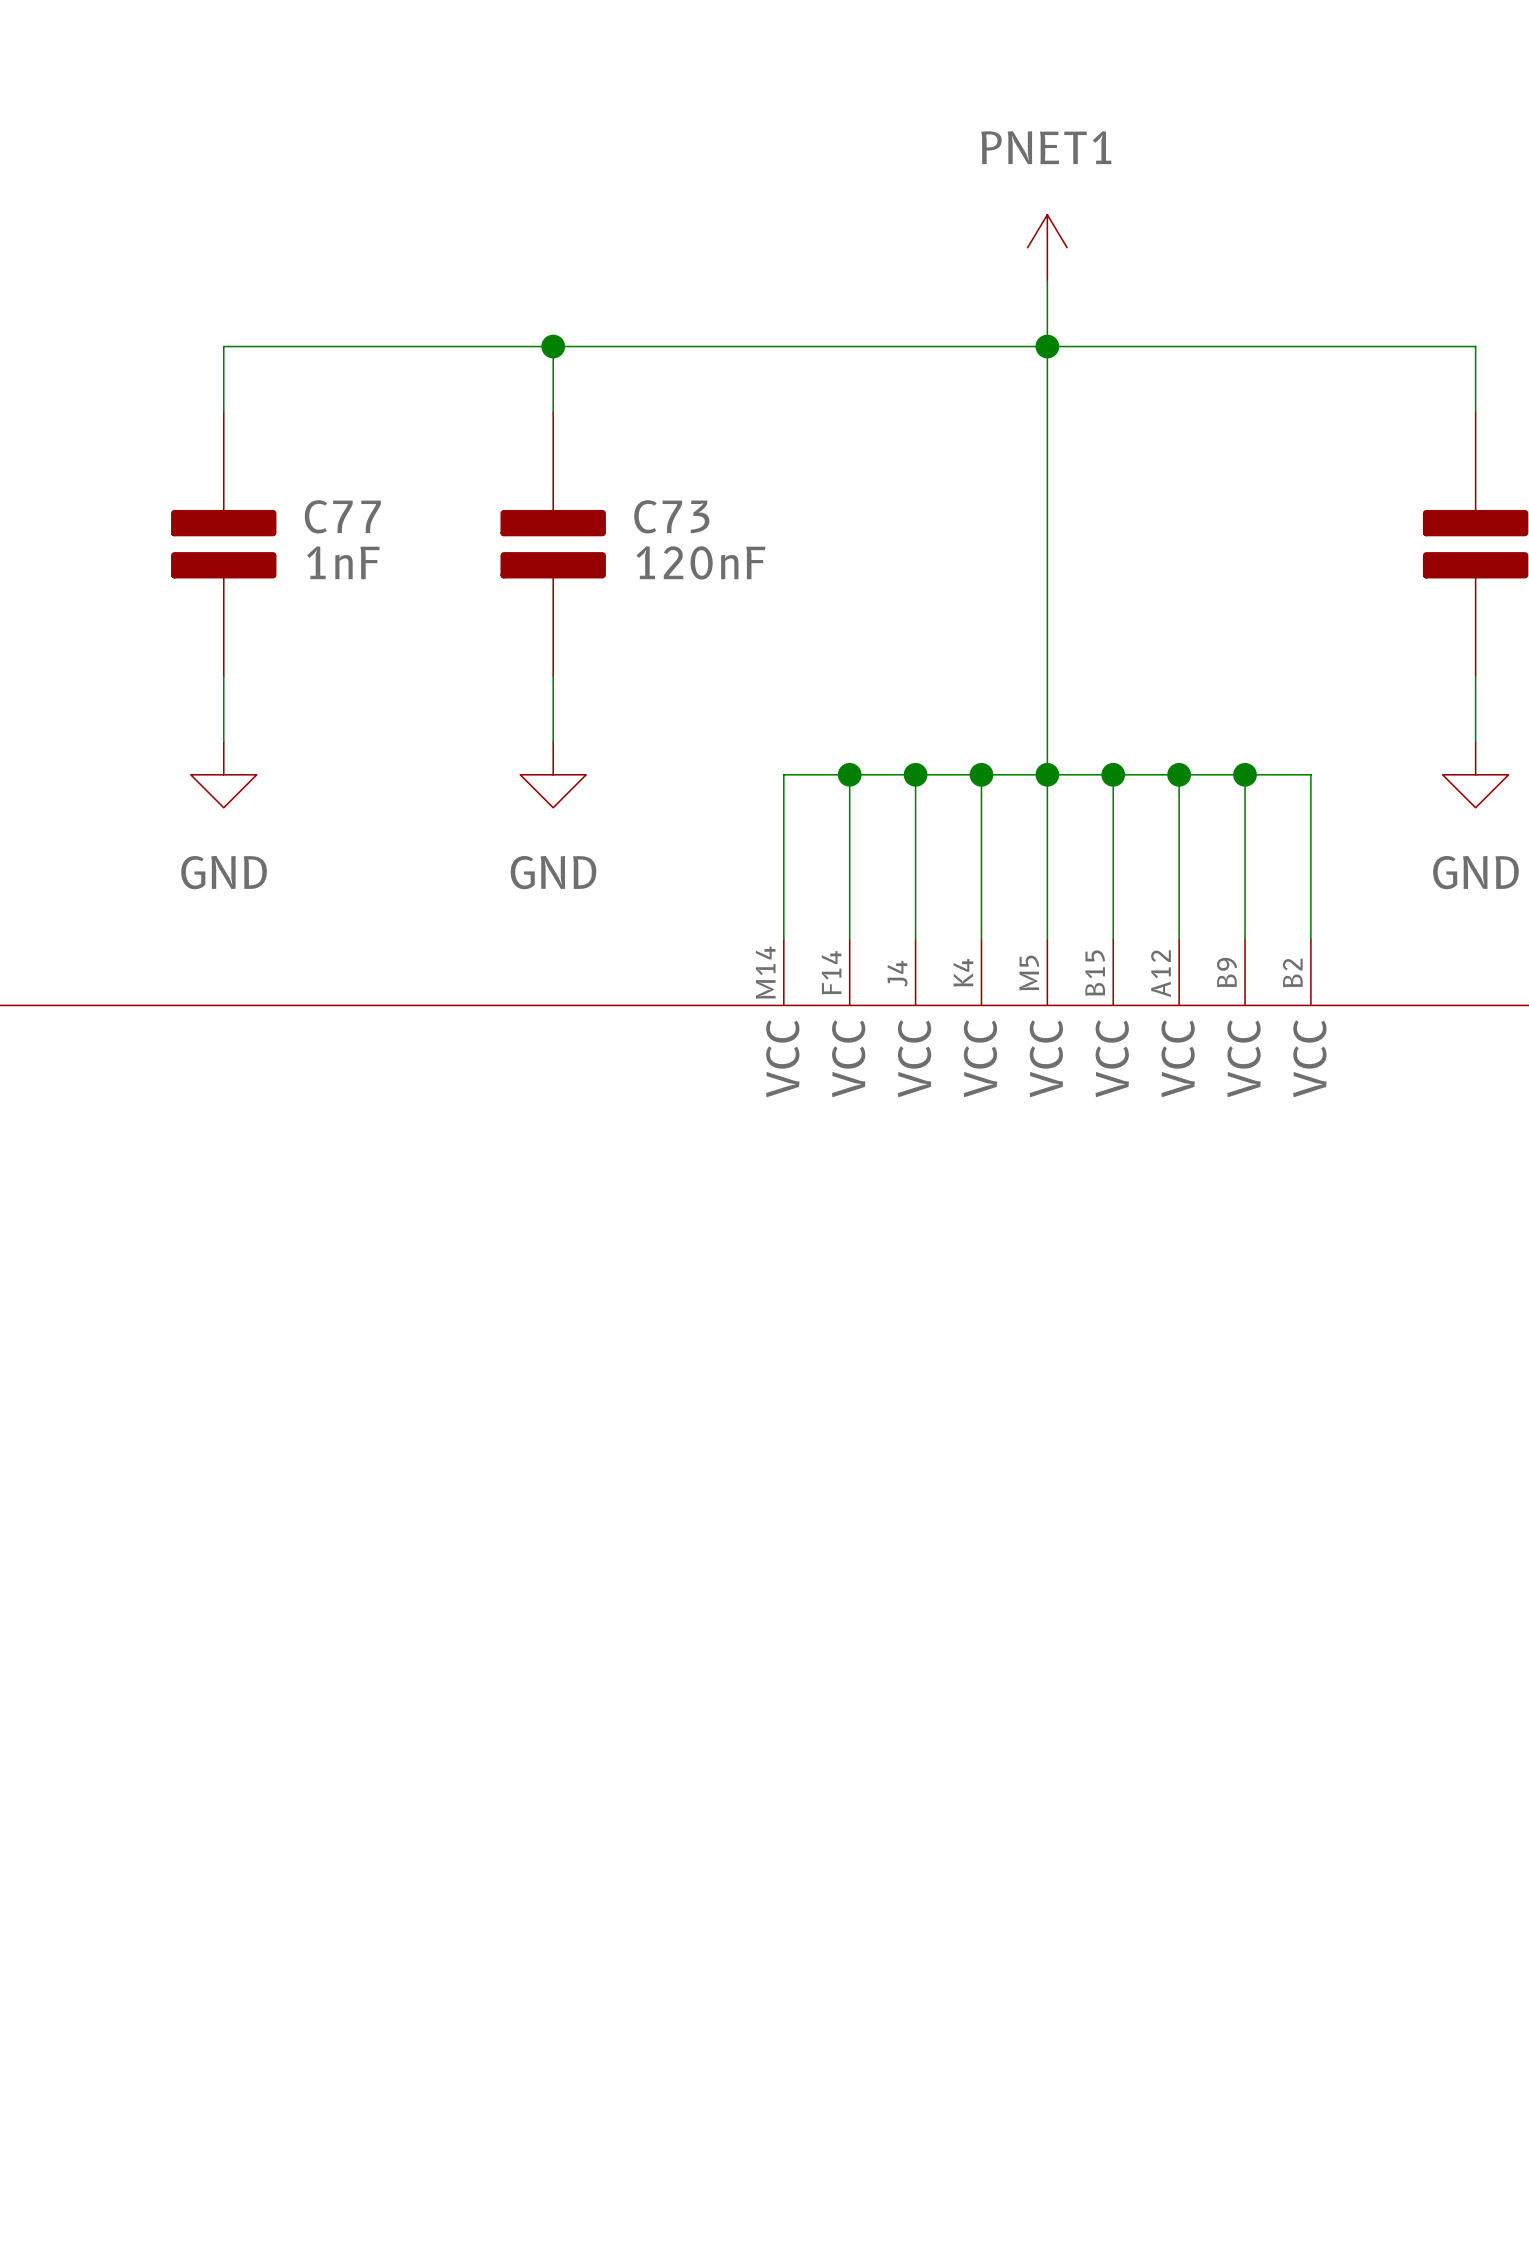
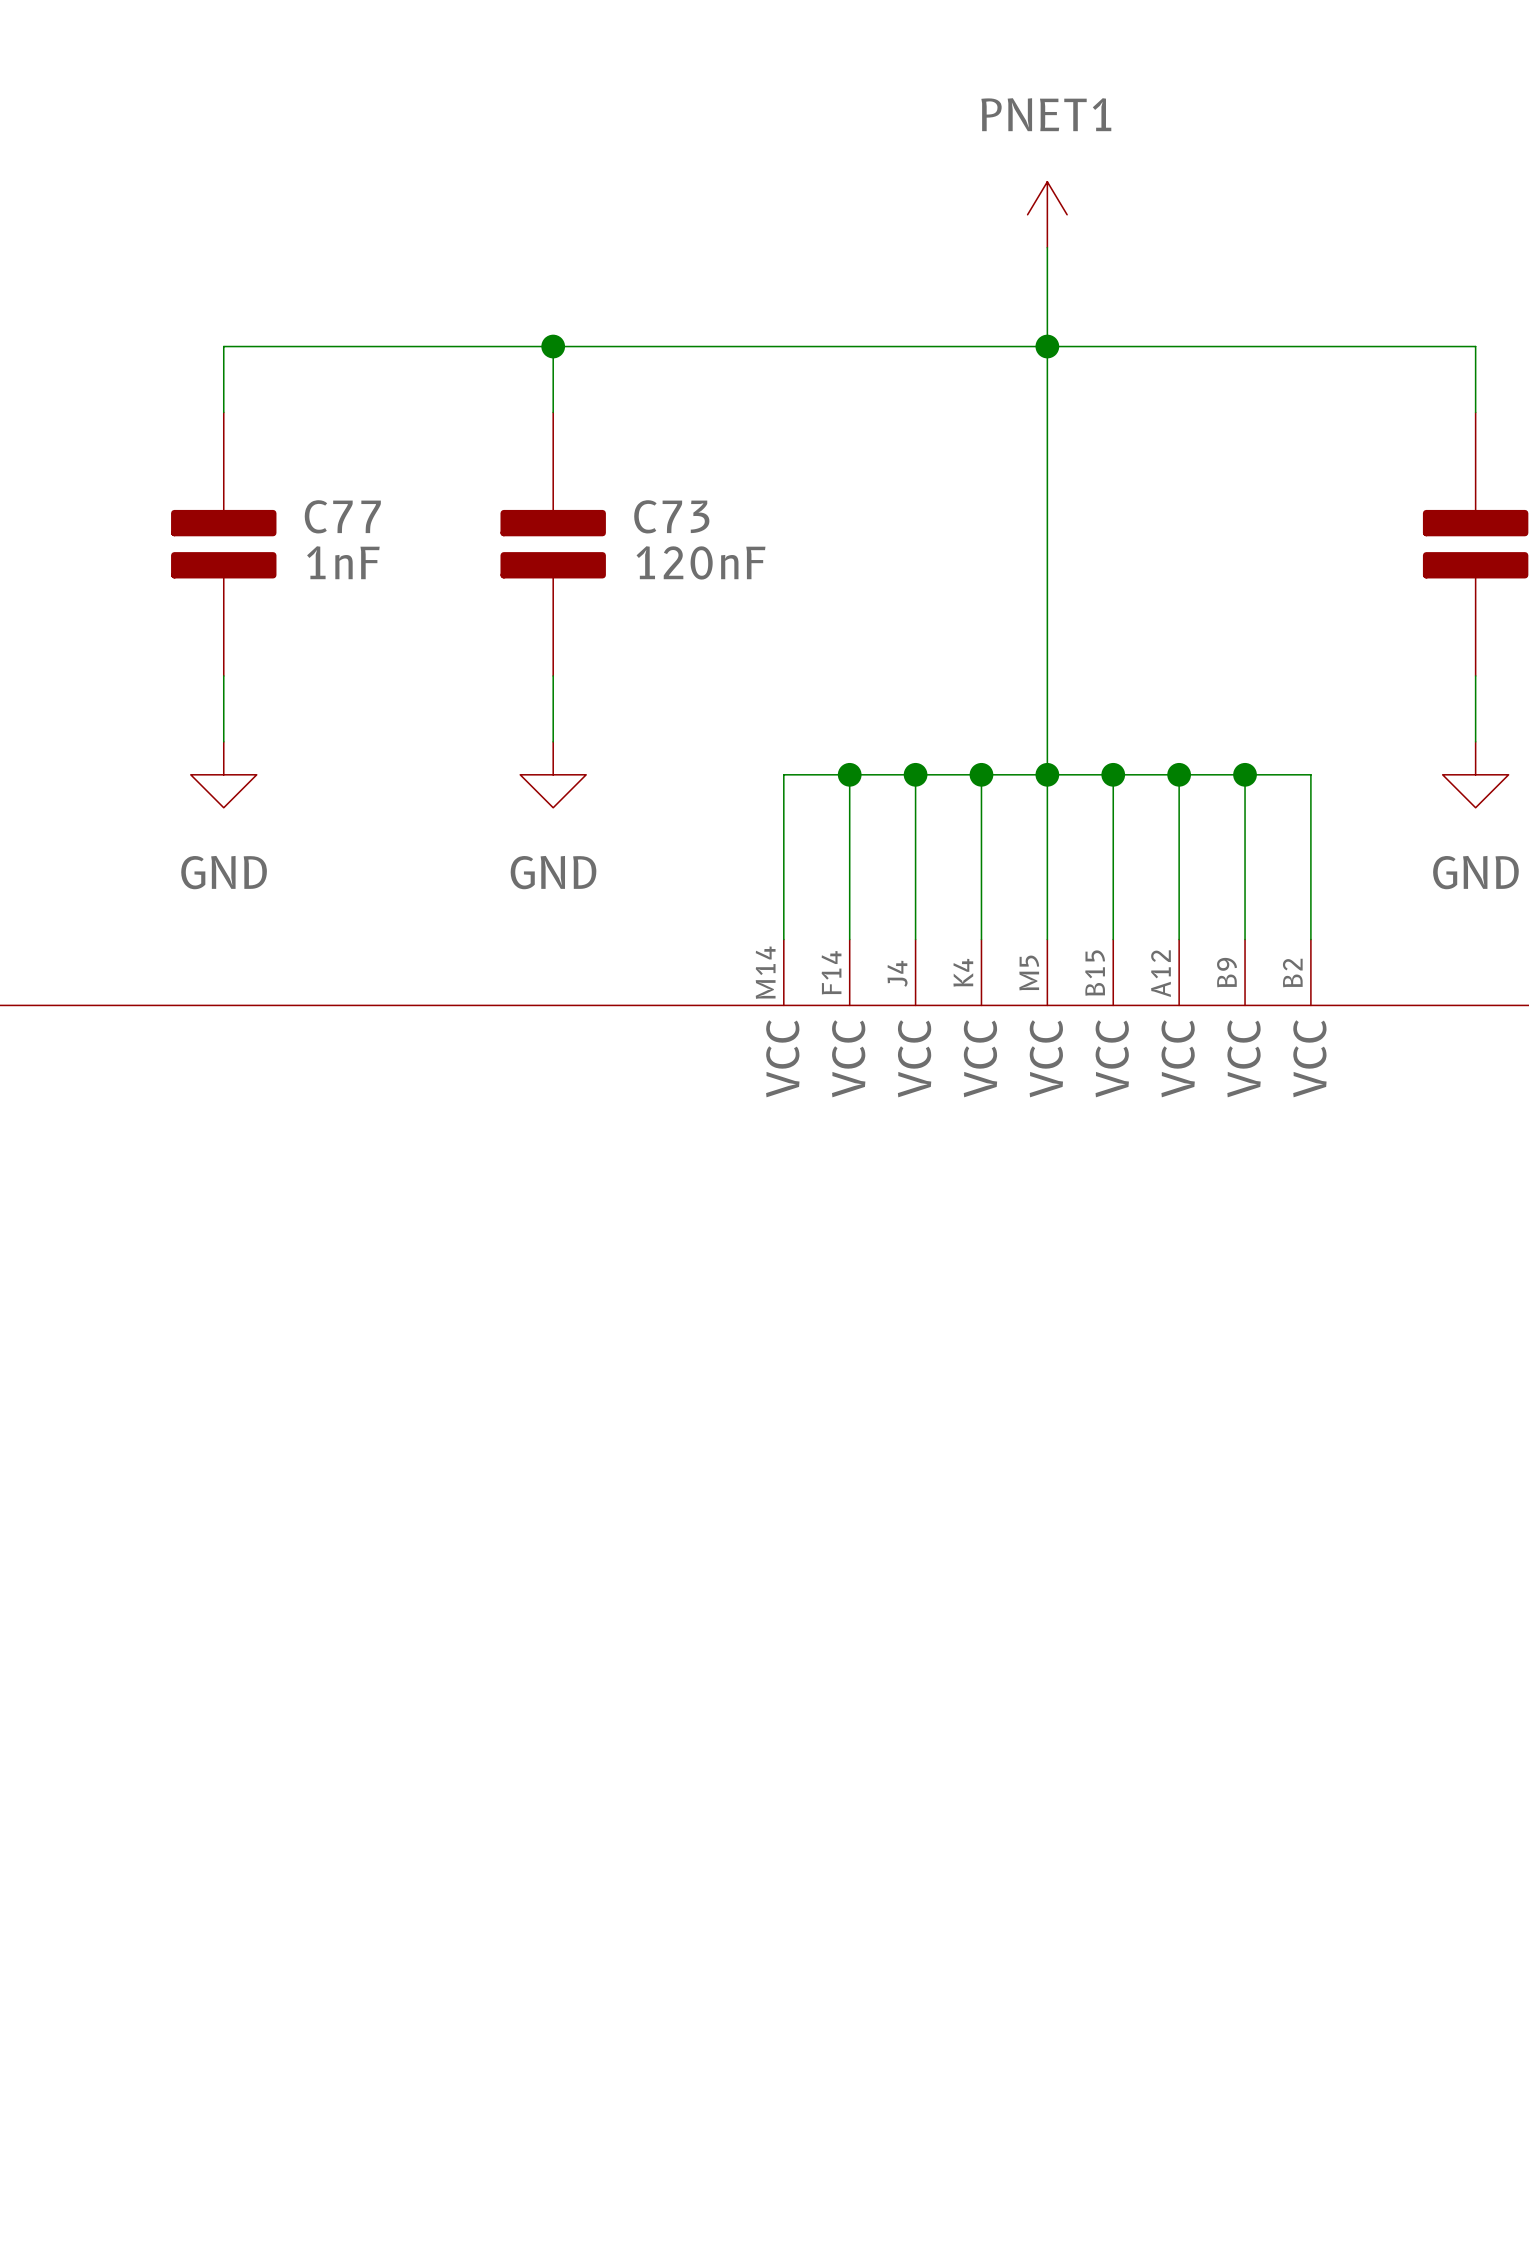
power symbol position: PNET1 (1047, 247) -> PNET1 (1047, 214)

